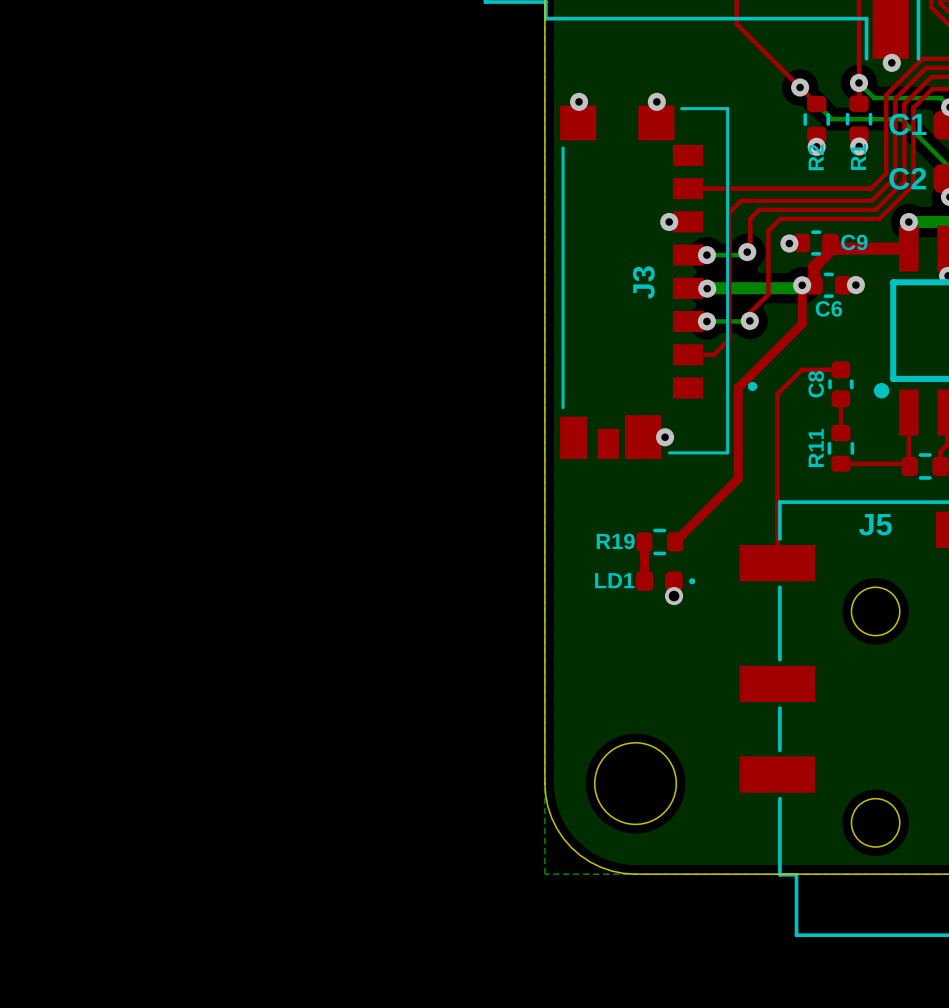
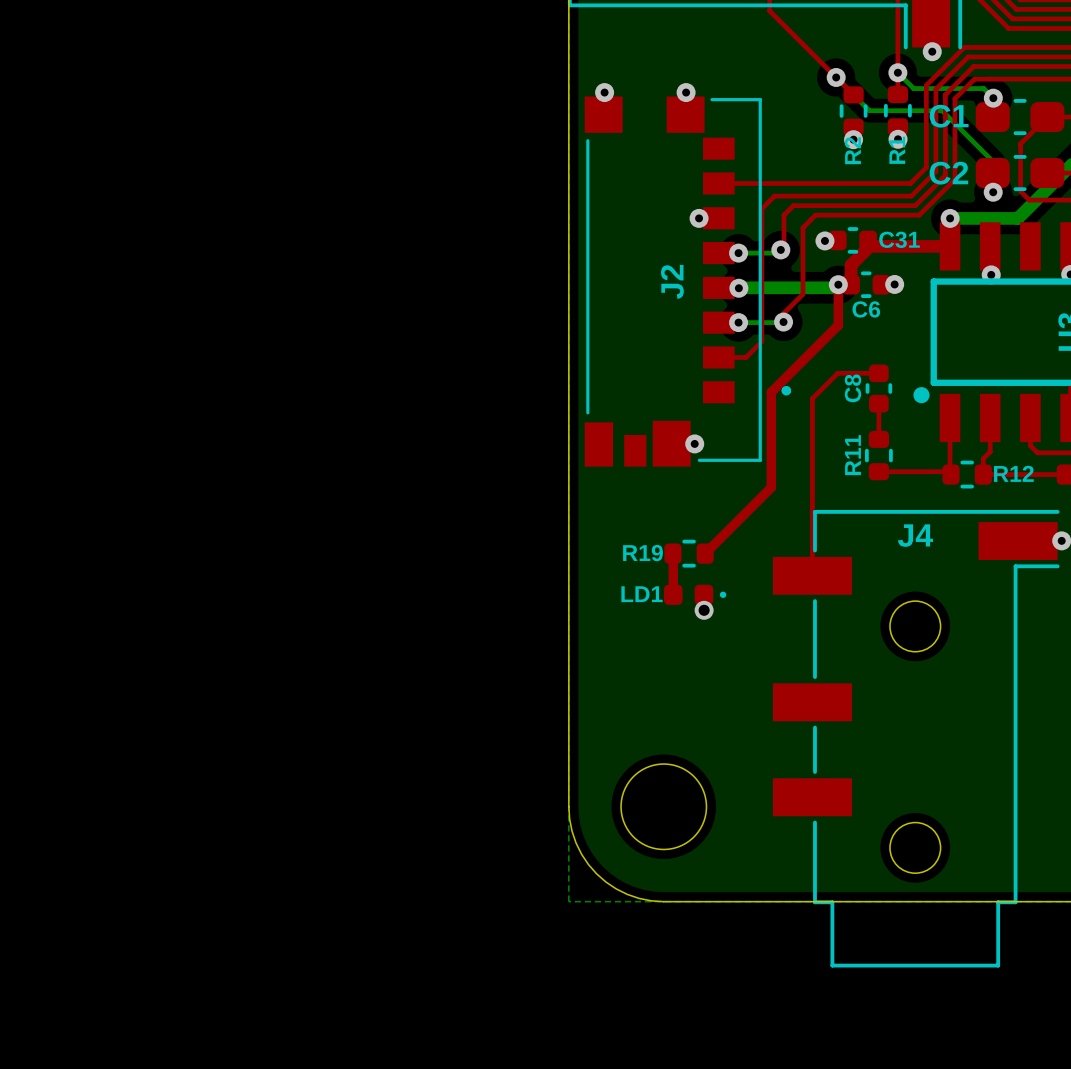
C9 name: C9 (854, 242) -> C31 (899, 239)
J3 name: J3 (643, 282) -> J2 (672, 281)
J5 name: J5 (875, 524) -> J4 (915, 535)

